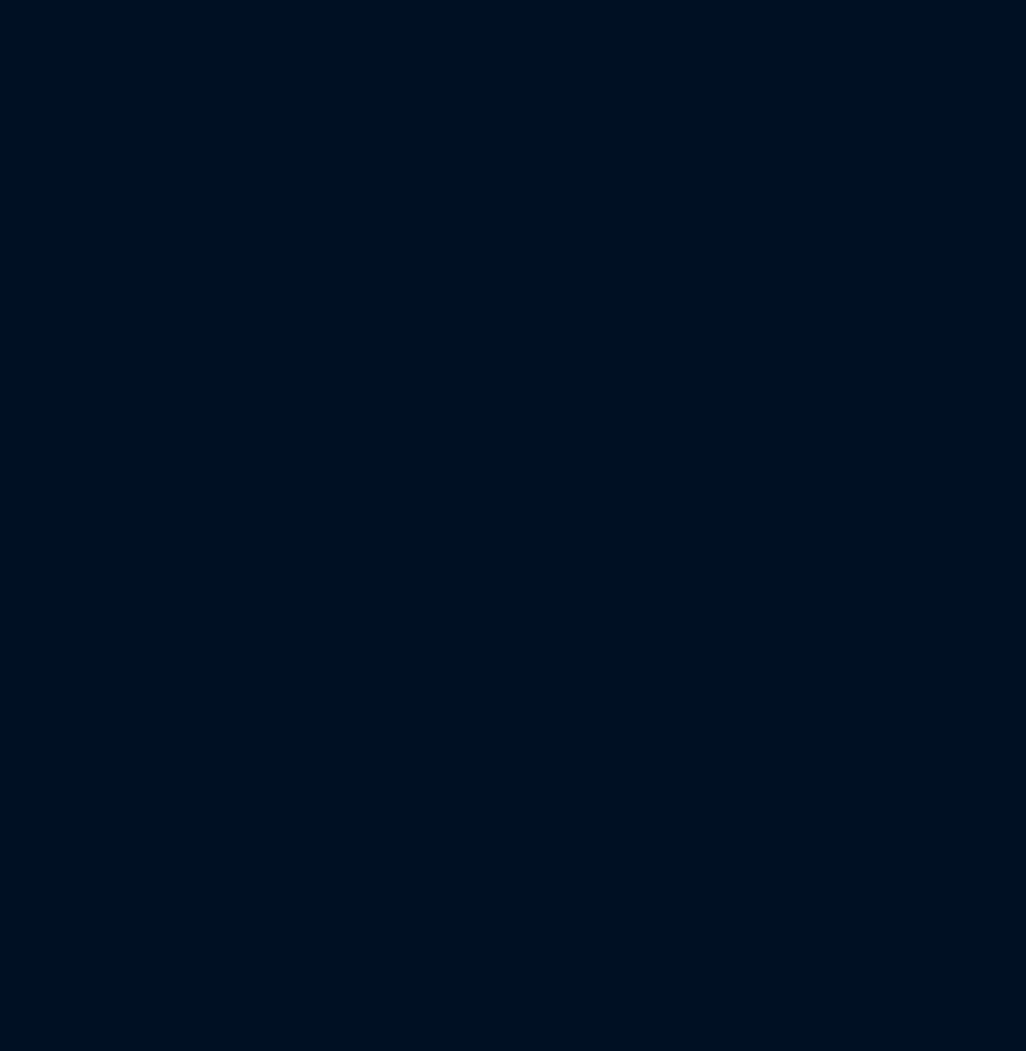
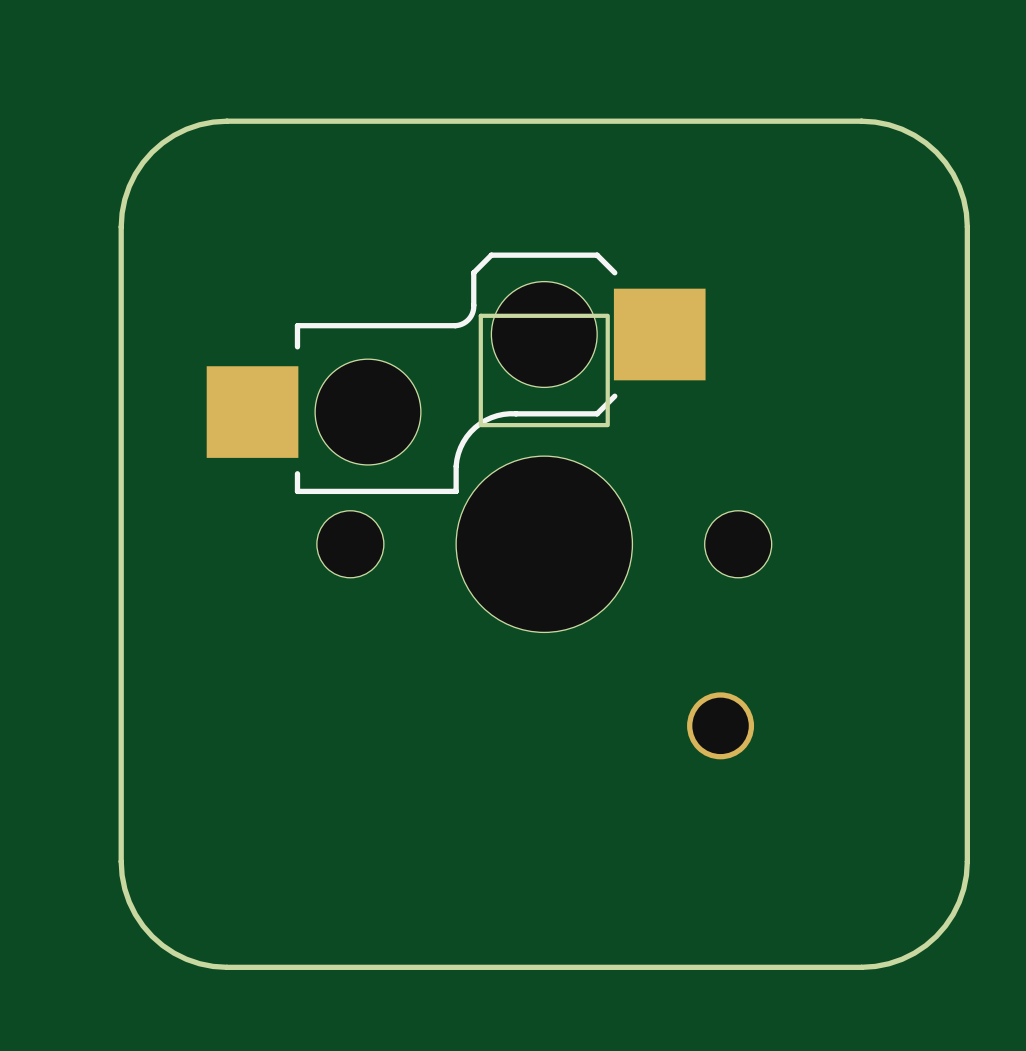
board edge: none -> (226, 121) (861, 121) (888, 124) (914, 135) (936, 152) (945, 162) (953, 174) (963, 199) (967, 226) (967, 861) (966, 875) (959, 902) (945, 925) (925, 945) (902, 959) (875, 966) (861, 967) (226, 967) (199, 963) (174, 953) (162, 945) (143, 925) (129, 902) (122, 875) (121, 861) (122, 213) (129, 186) (135, 174) (152, 152) (174, 135) (186, 129) (213, 122) (226, 121)
part: none -> (544, 370)
part: none -> (489, 505)

